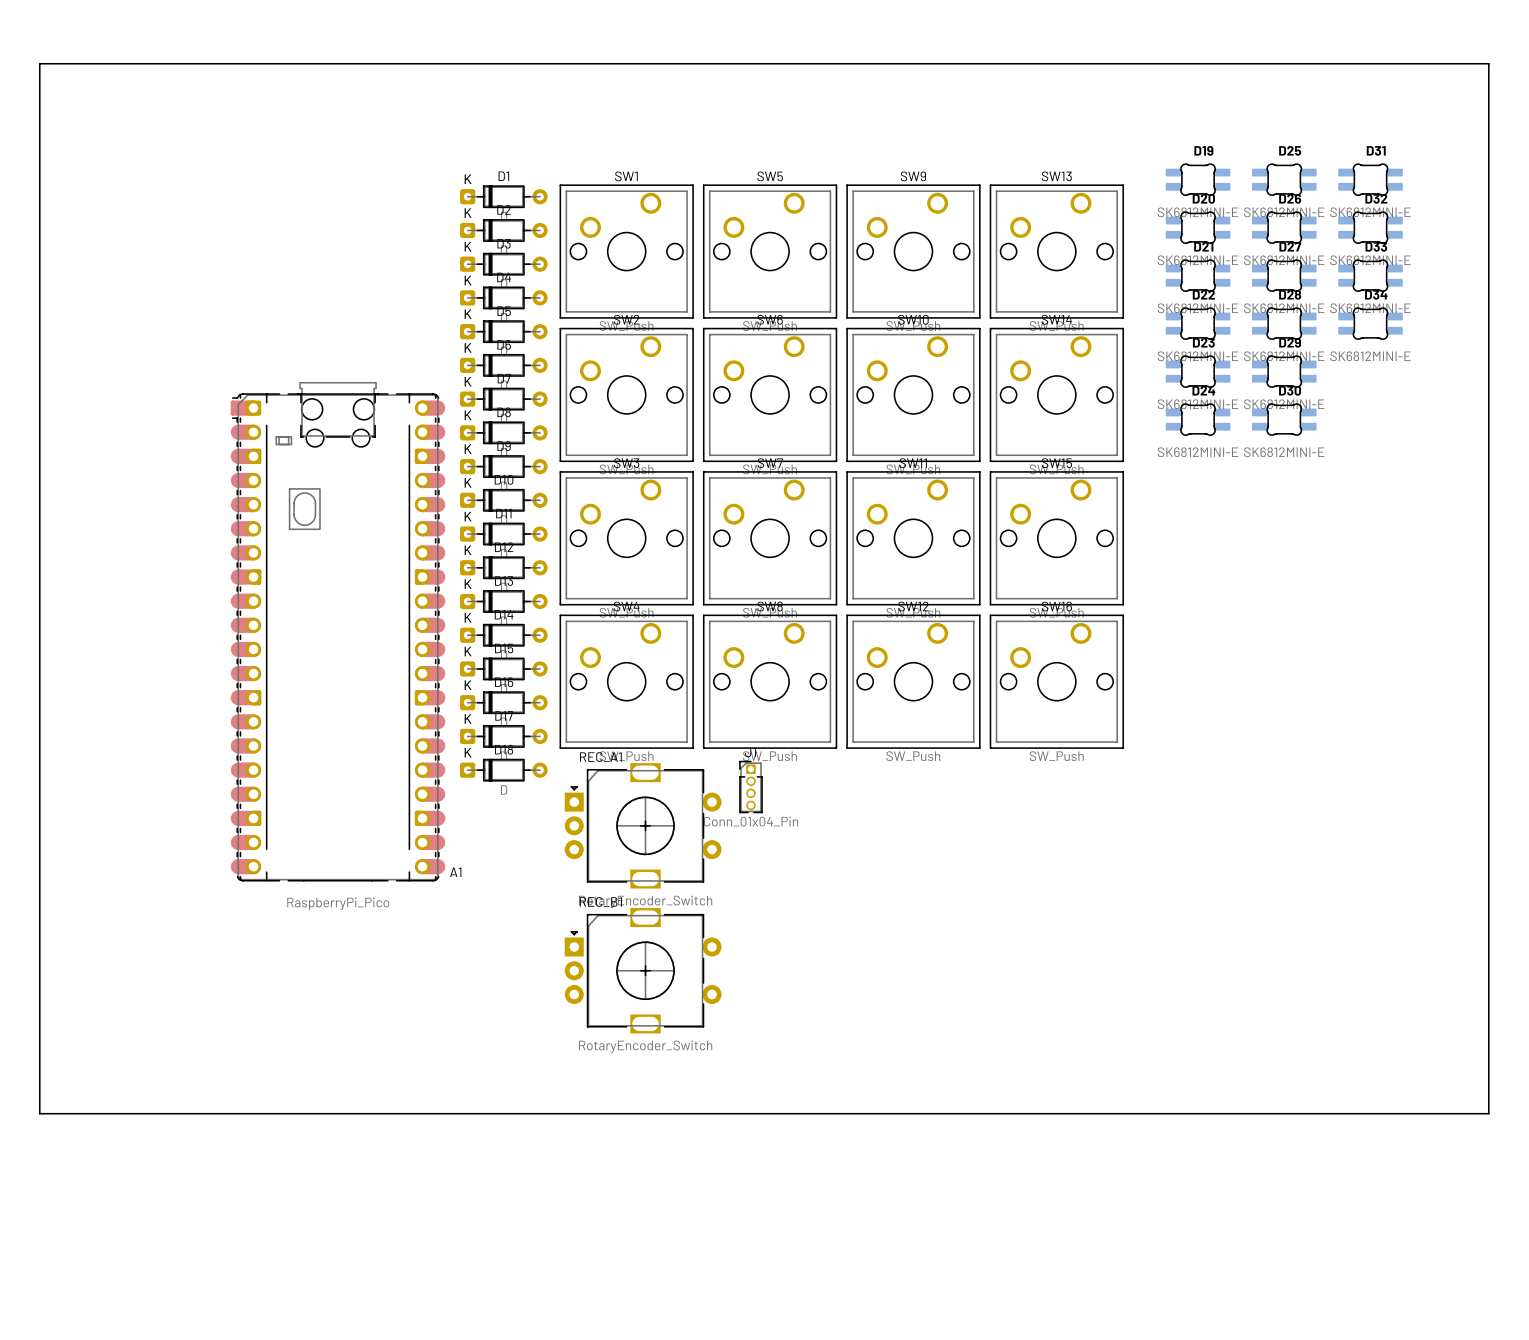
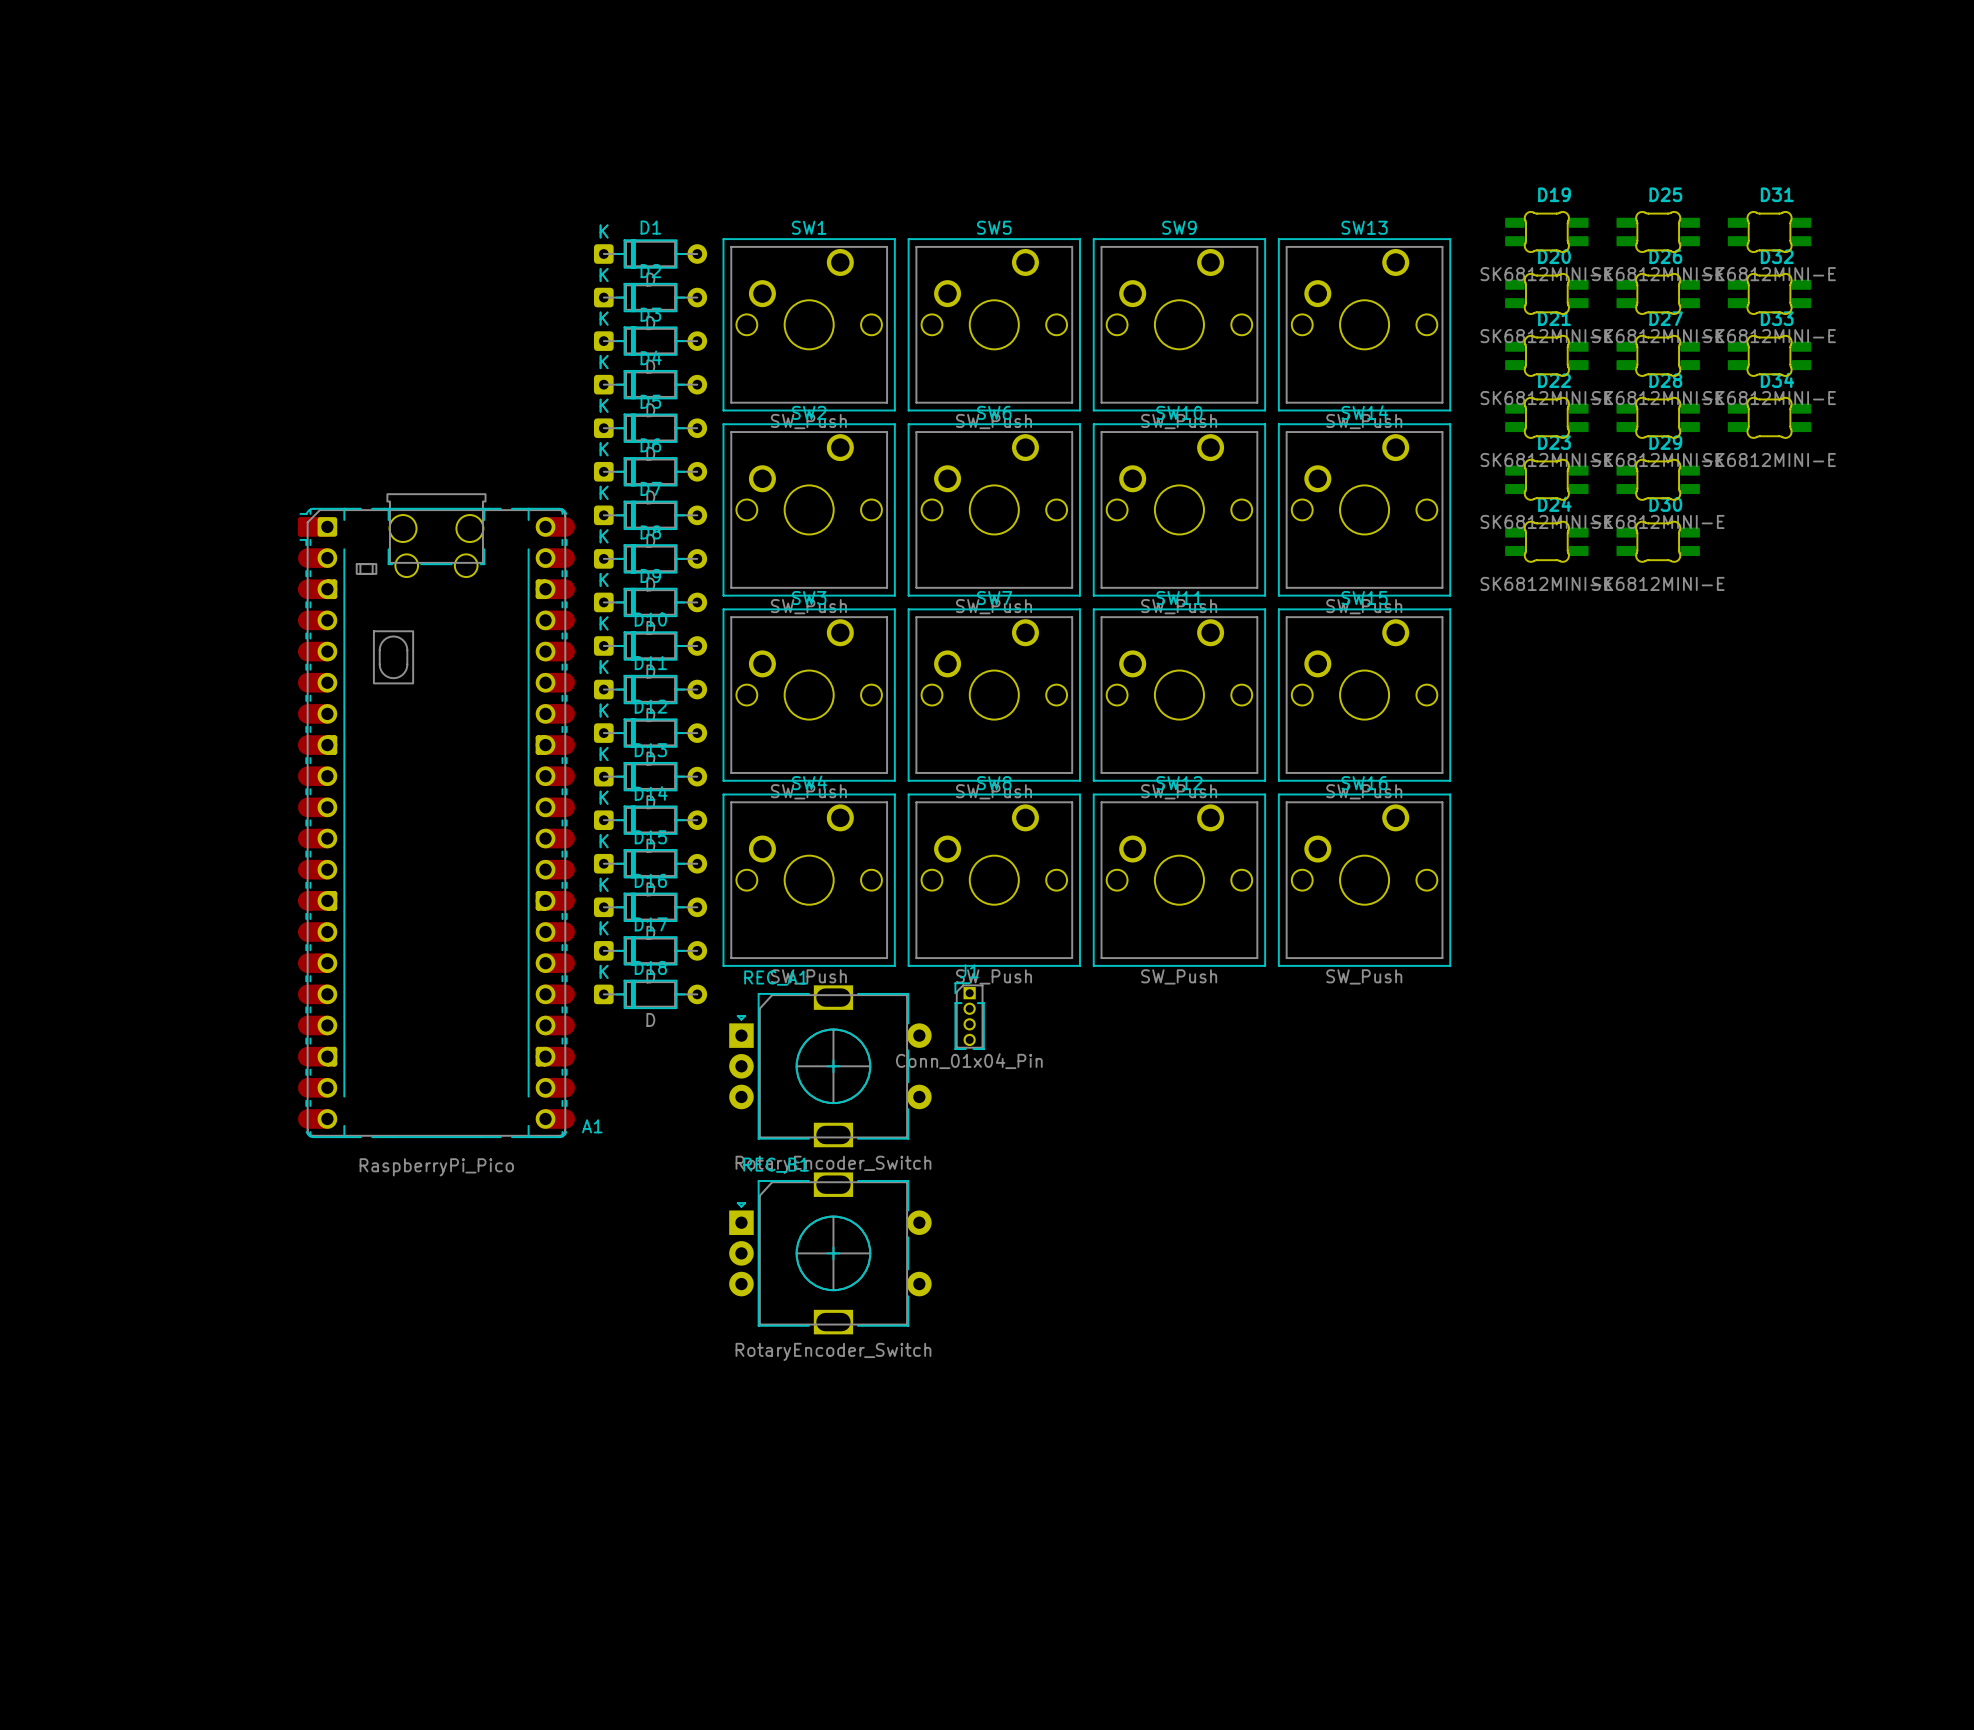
board edge: (39, 63) (1488, 63) (1488, 1113) (39, 1113) (39, 63) -> none

